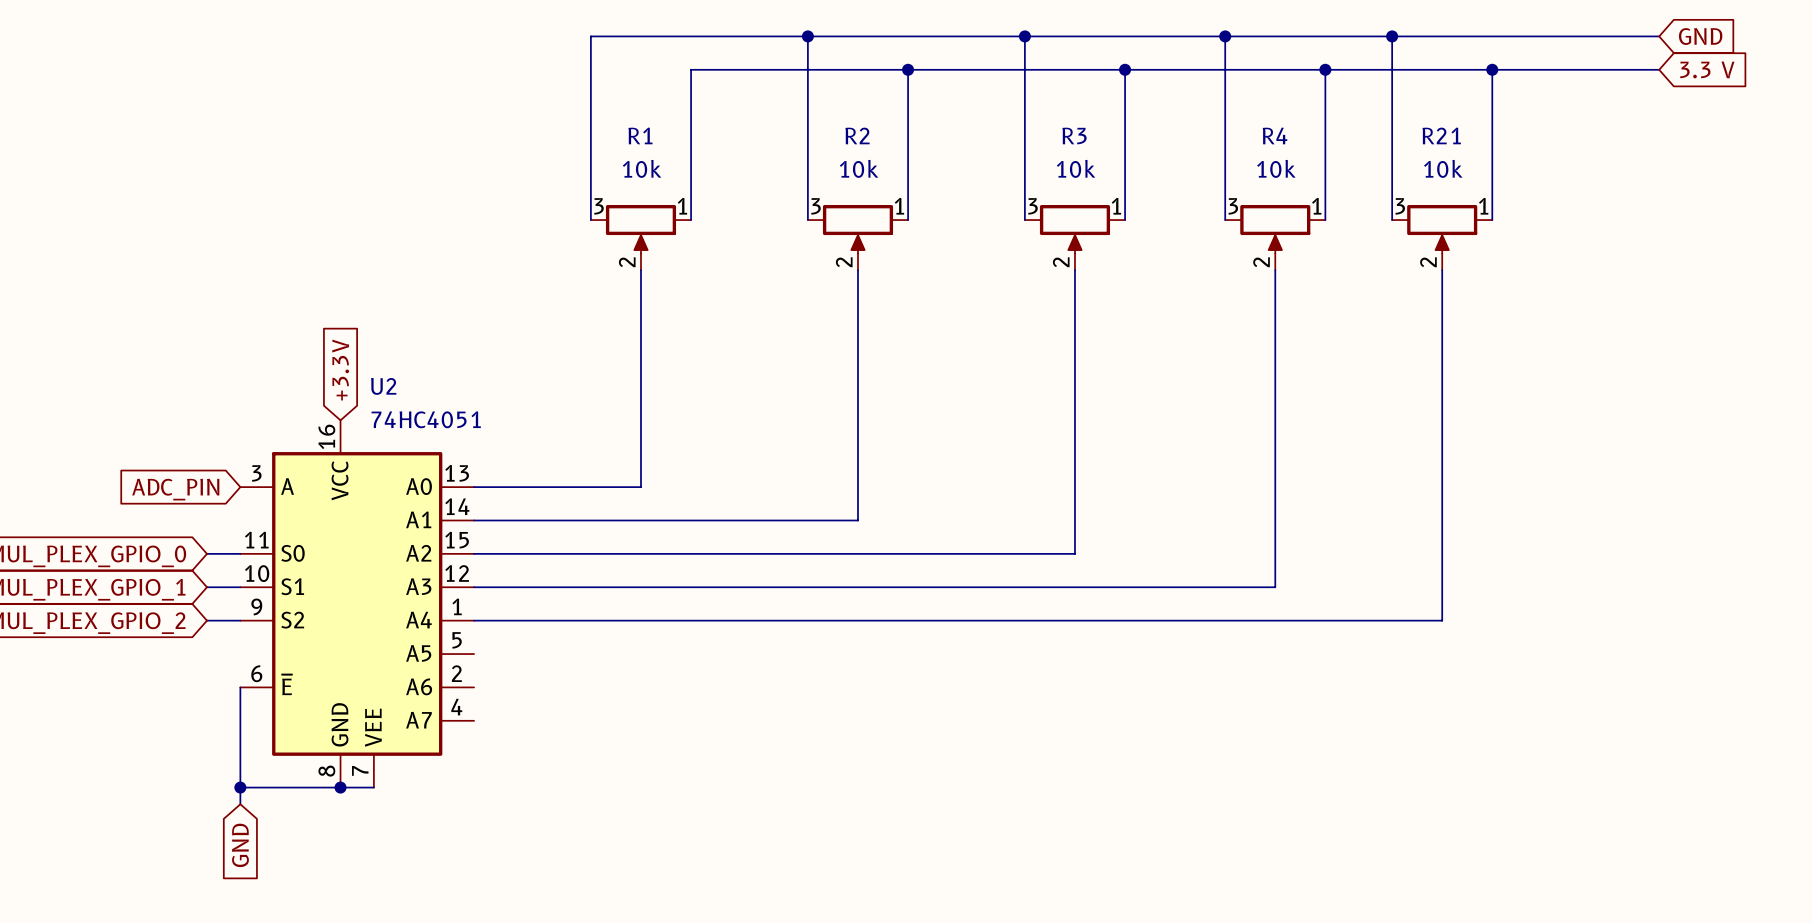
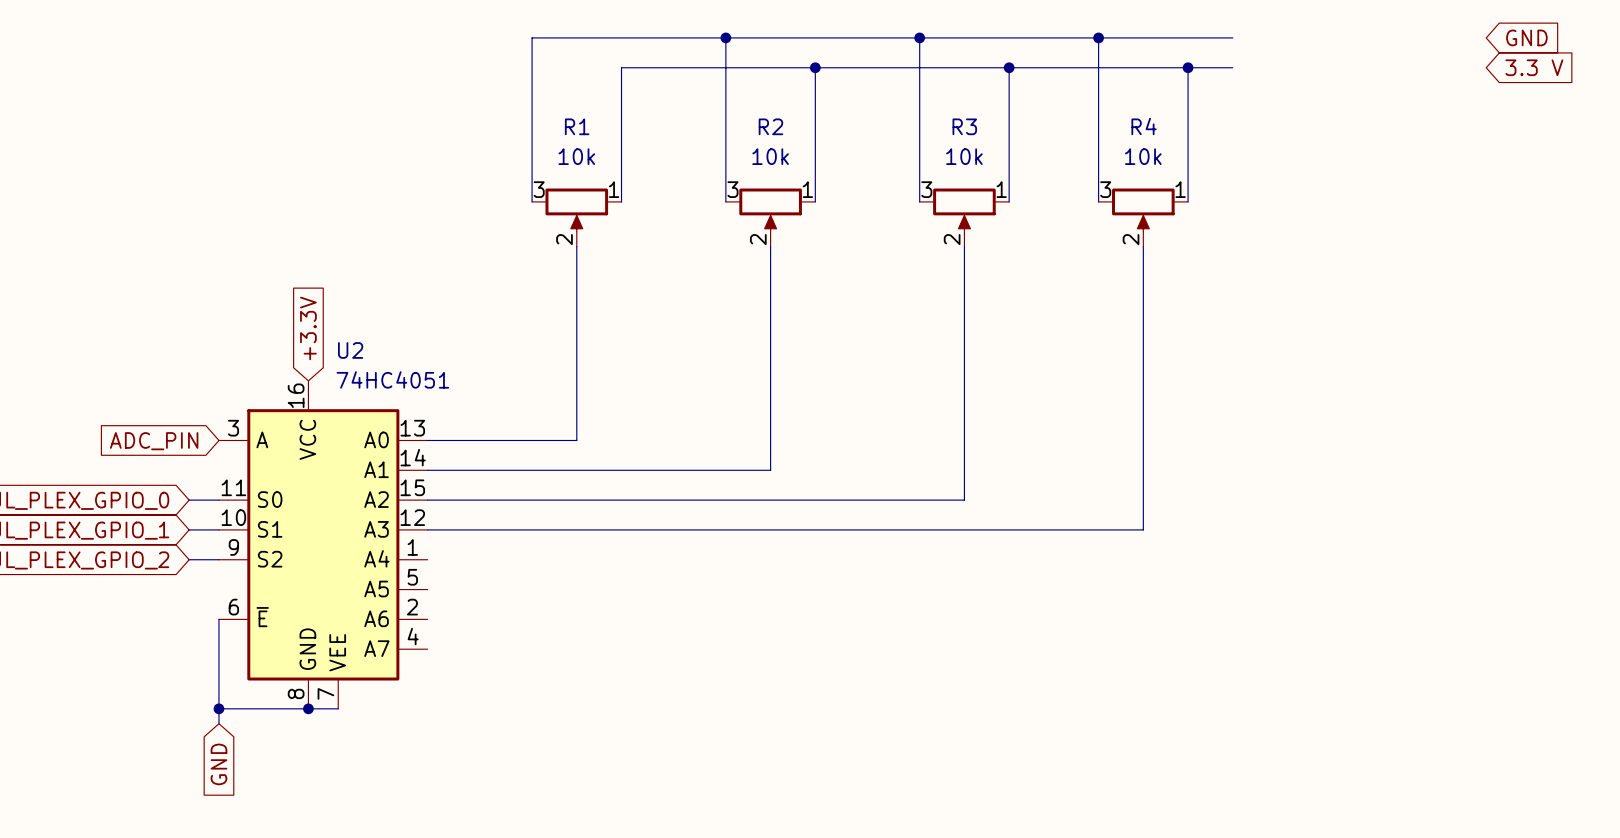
wire: (1375, 36) (1659, 36) -> none
wire: (1392, 36) (1392, 220) -> none
junction: (1392, 36) -> none
wire: (1375, 69) (1659, 69) -> none
wire: (1492, 69) (1492, 220) -> none
junction: (1492, 69) -> none
R21: 10k (1442, 237) -> none
wire: (1442, 270) (1442, 620) (474, 620) -> none

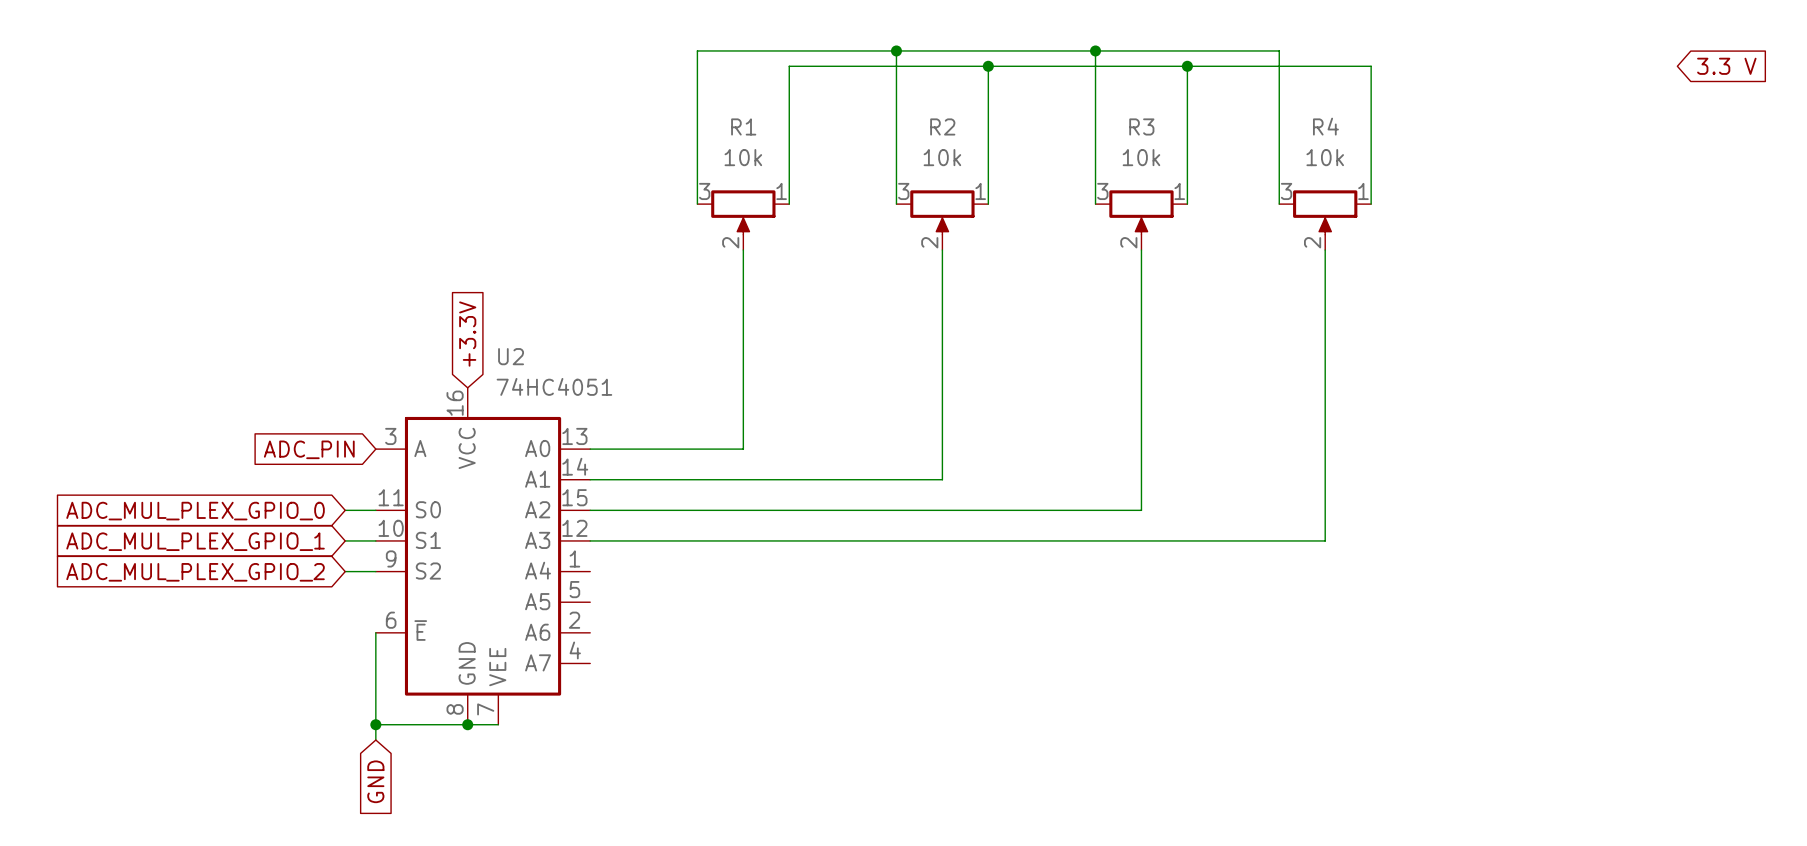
wire: (725, 37) (725, 52) -> none
junction position: (725, 37) -> (896, 50)
wire: (919, 37) (919, 52) -> none
junction position: (919, 37) -> (1095, 50)
wire: (1098, 37) (1098, 52) -> none
junction: (1098, 37) -> none
wire: (1232, 37) (532, 37) (532, 52) -> (1279, 50) (697, 50)
global label: GND (1526, 37) -> none
wire: (1188, 67) (1232, 67) -> none
junction: (1188, 67) -> none

